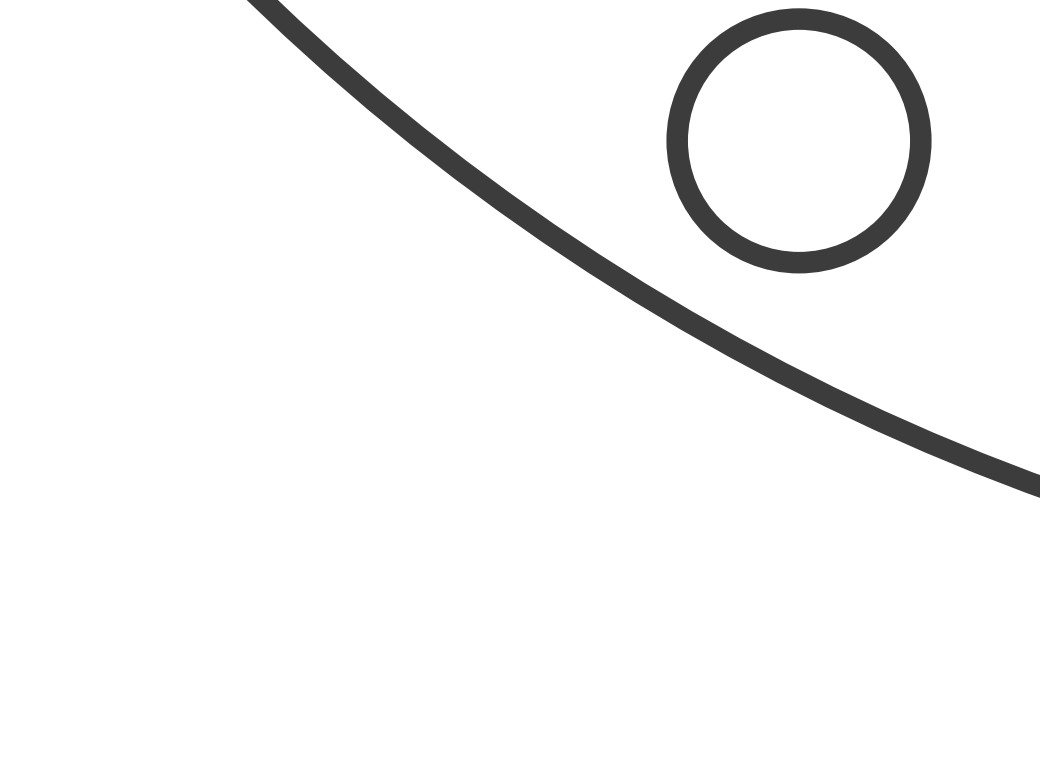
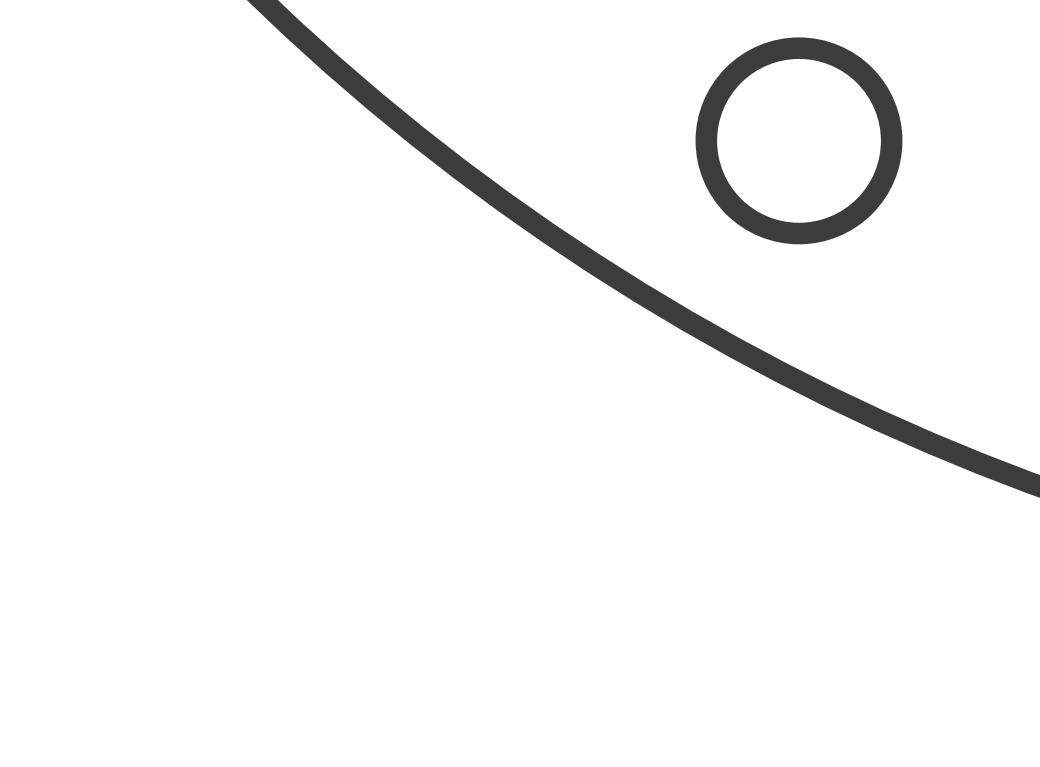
drawing shape: [666, 8, 932, 274] -> [695, 37, 903, 245]

